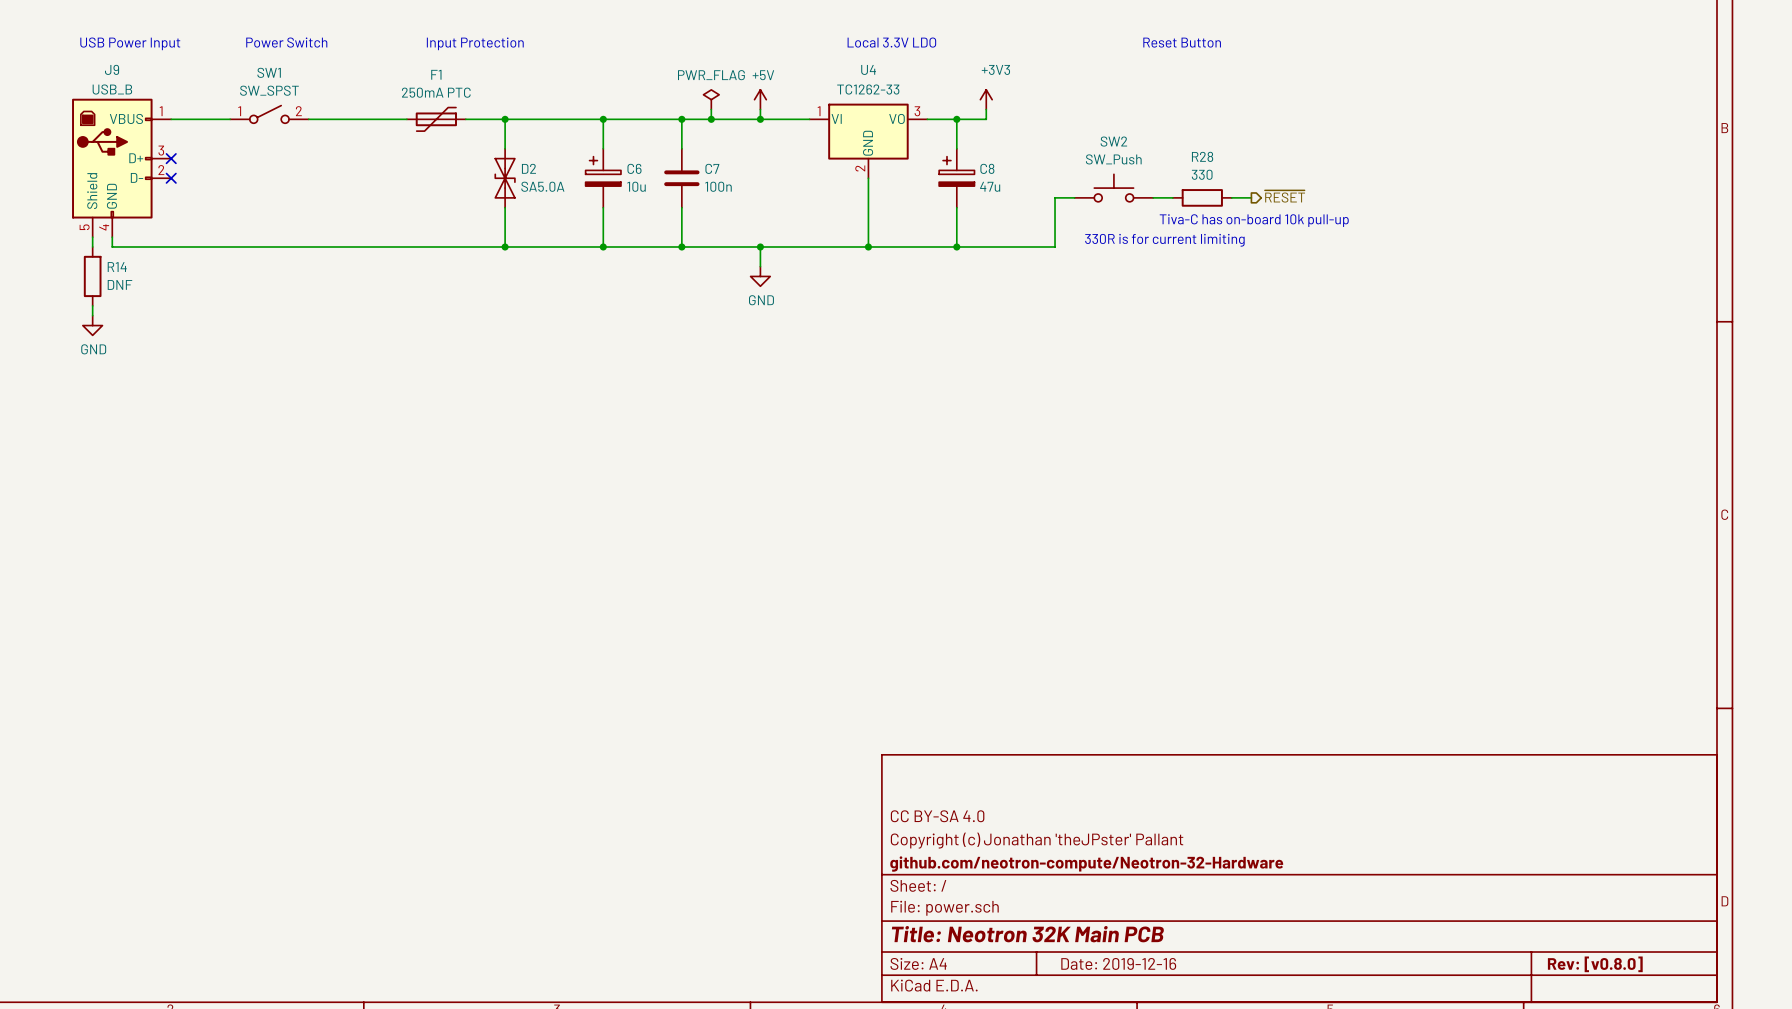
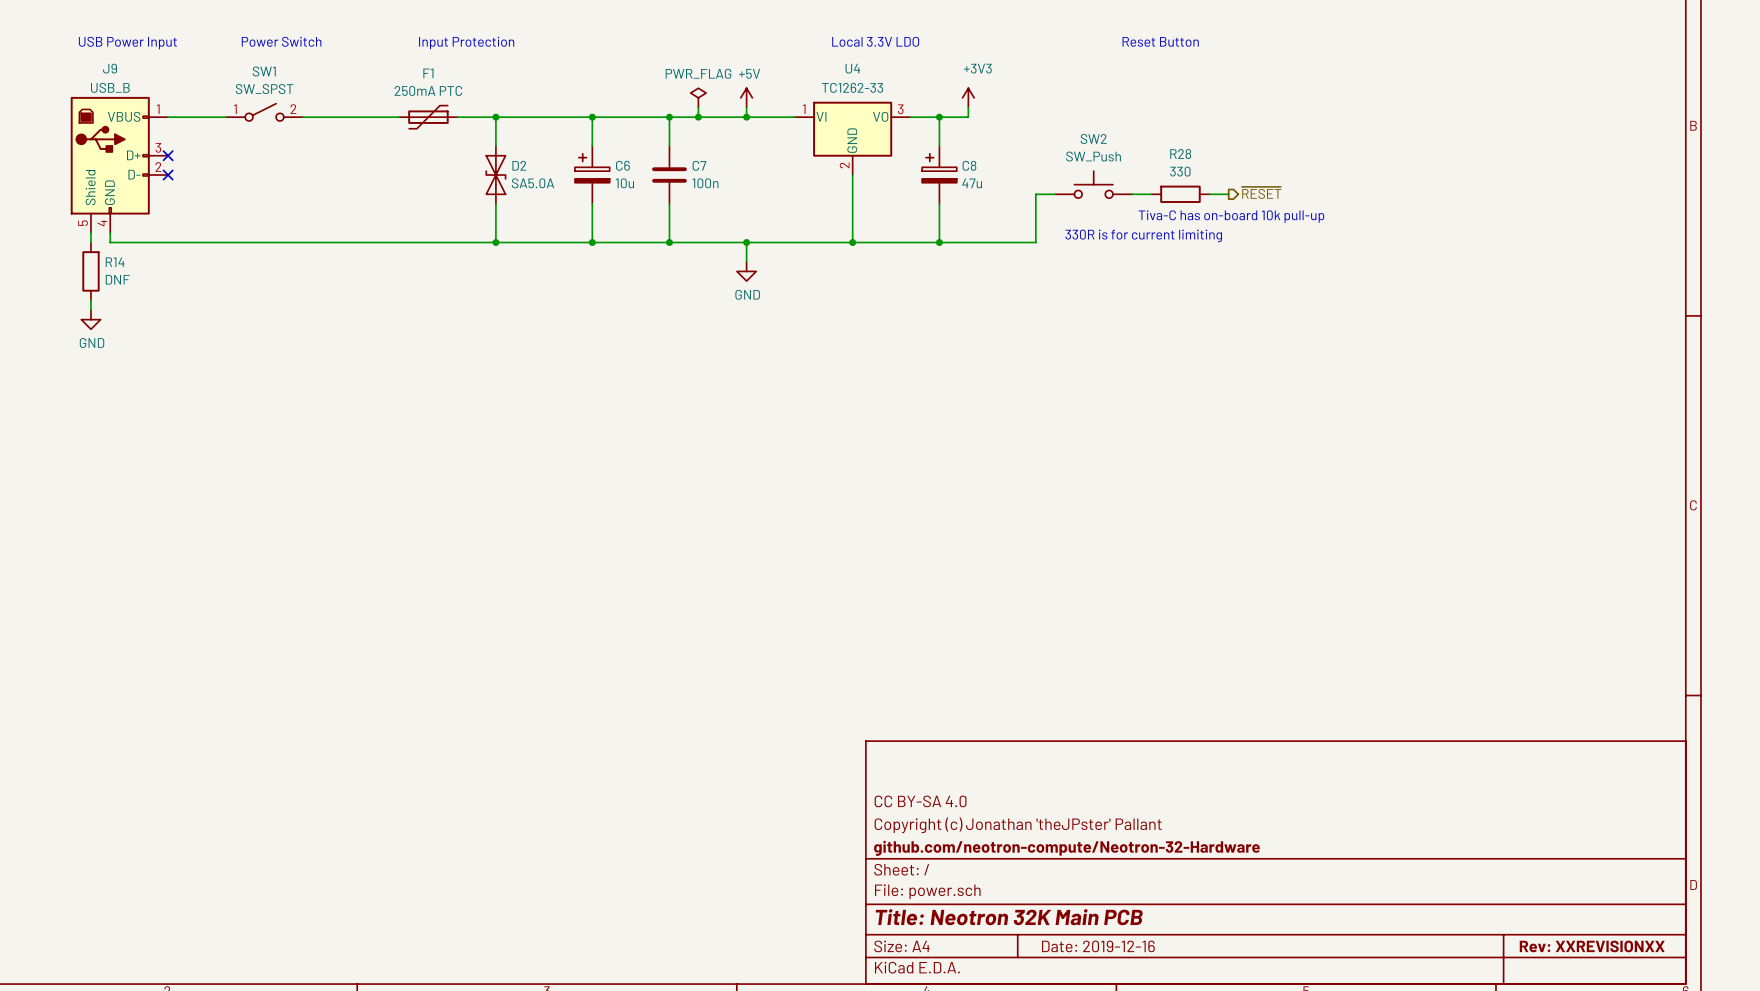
title block: Rev: [v0.8.0] (1595, 964) -> Rev: XXREVISIONXX (1592, 946)

